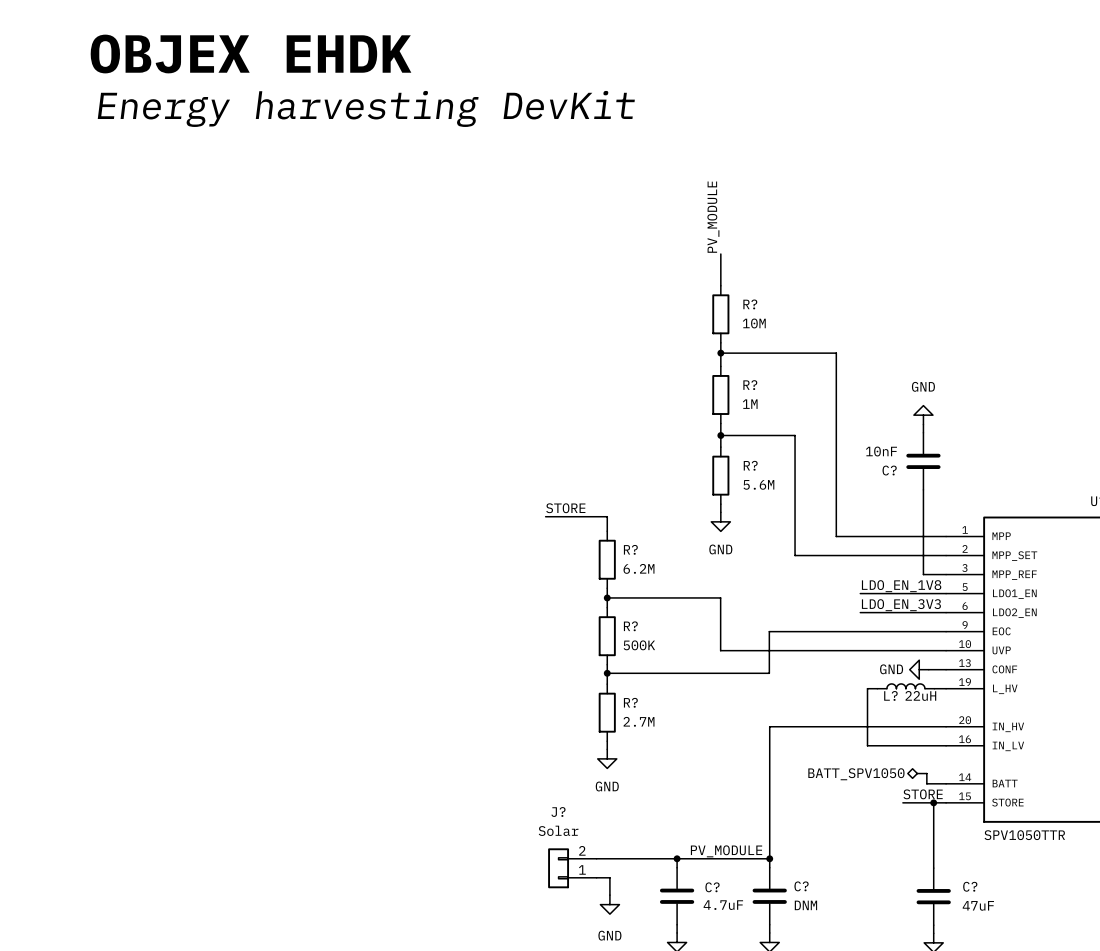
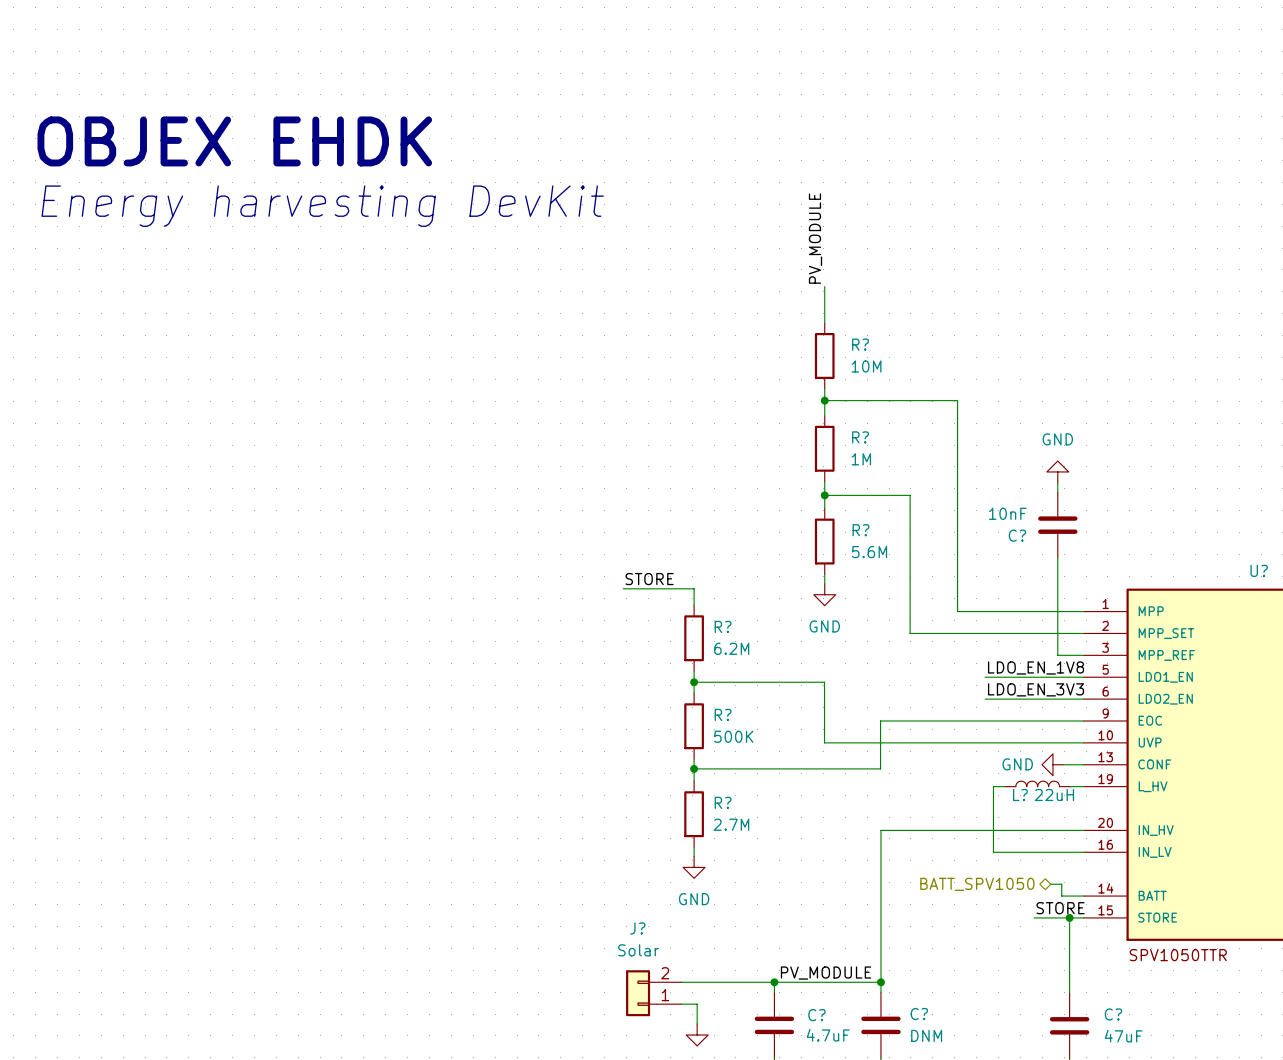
text position: OBJEX EHDK (251, 54) -> OBJEX EHDK (234, 141)
text position: Energy harvesting DevKit (366, 108) -> Energy harvesting DevKit (322, 206)

